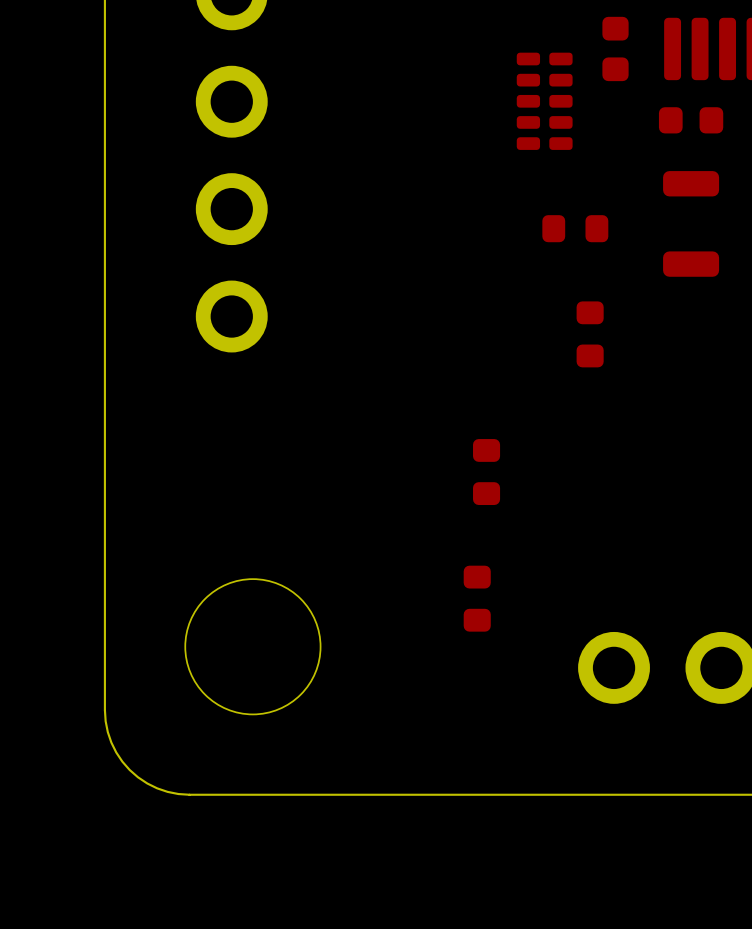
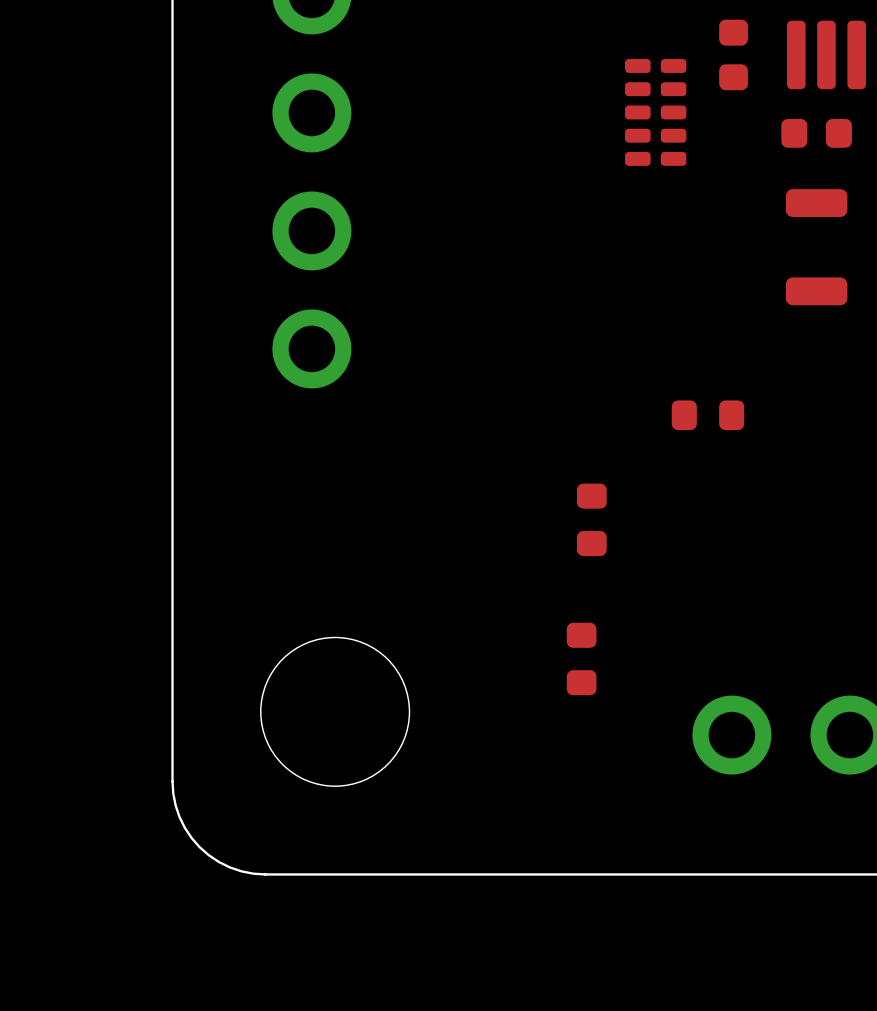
part: (575, 228) -> none
part rotation: 0° (590, 334) -> 90° clockwise (708, 415)
part position: (590, 334) -> (708, 415)

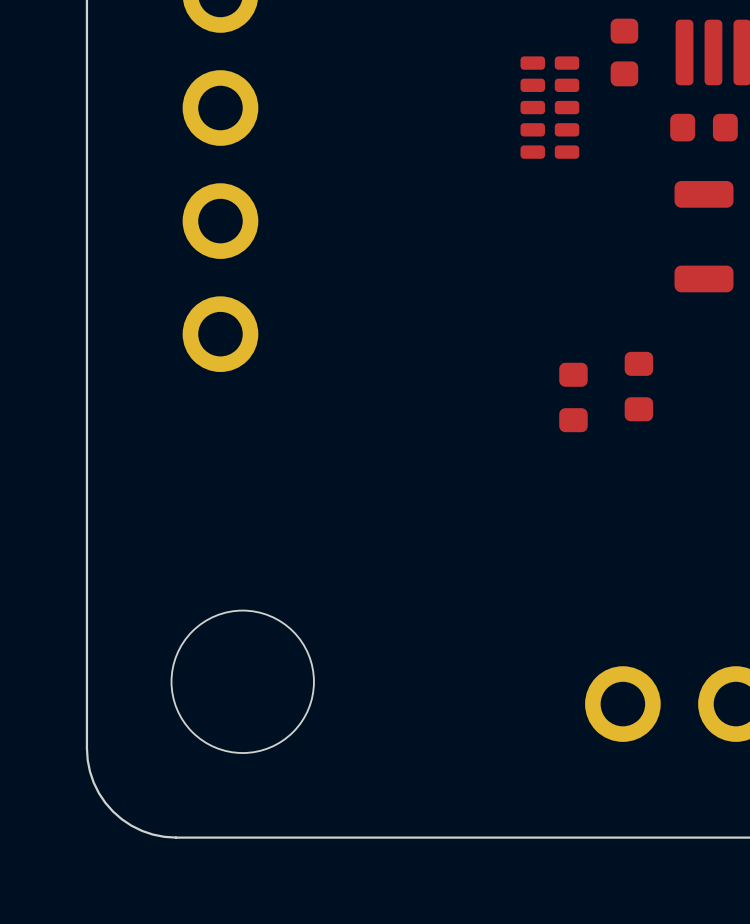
part: none -> (638, 386)
part: none -> (573, 397)
part: (708, 415) -> none
part: (591, 519) -> none
part: (581, 658) -> none

